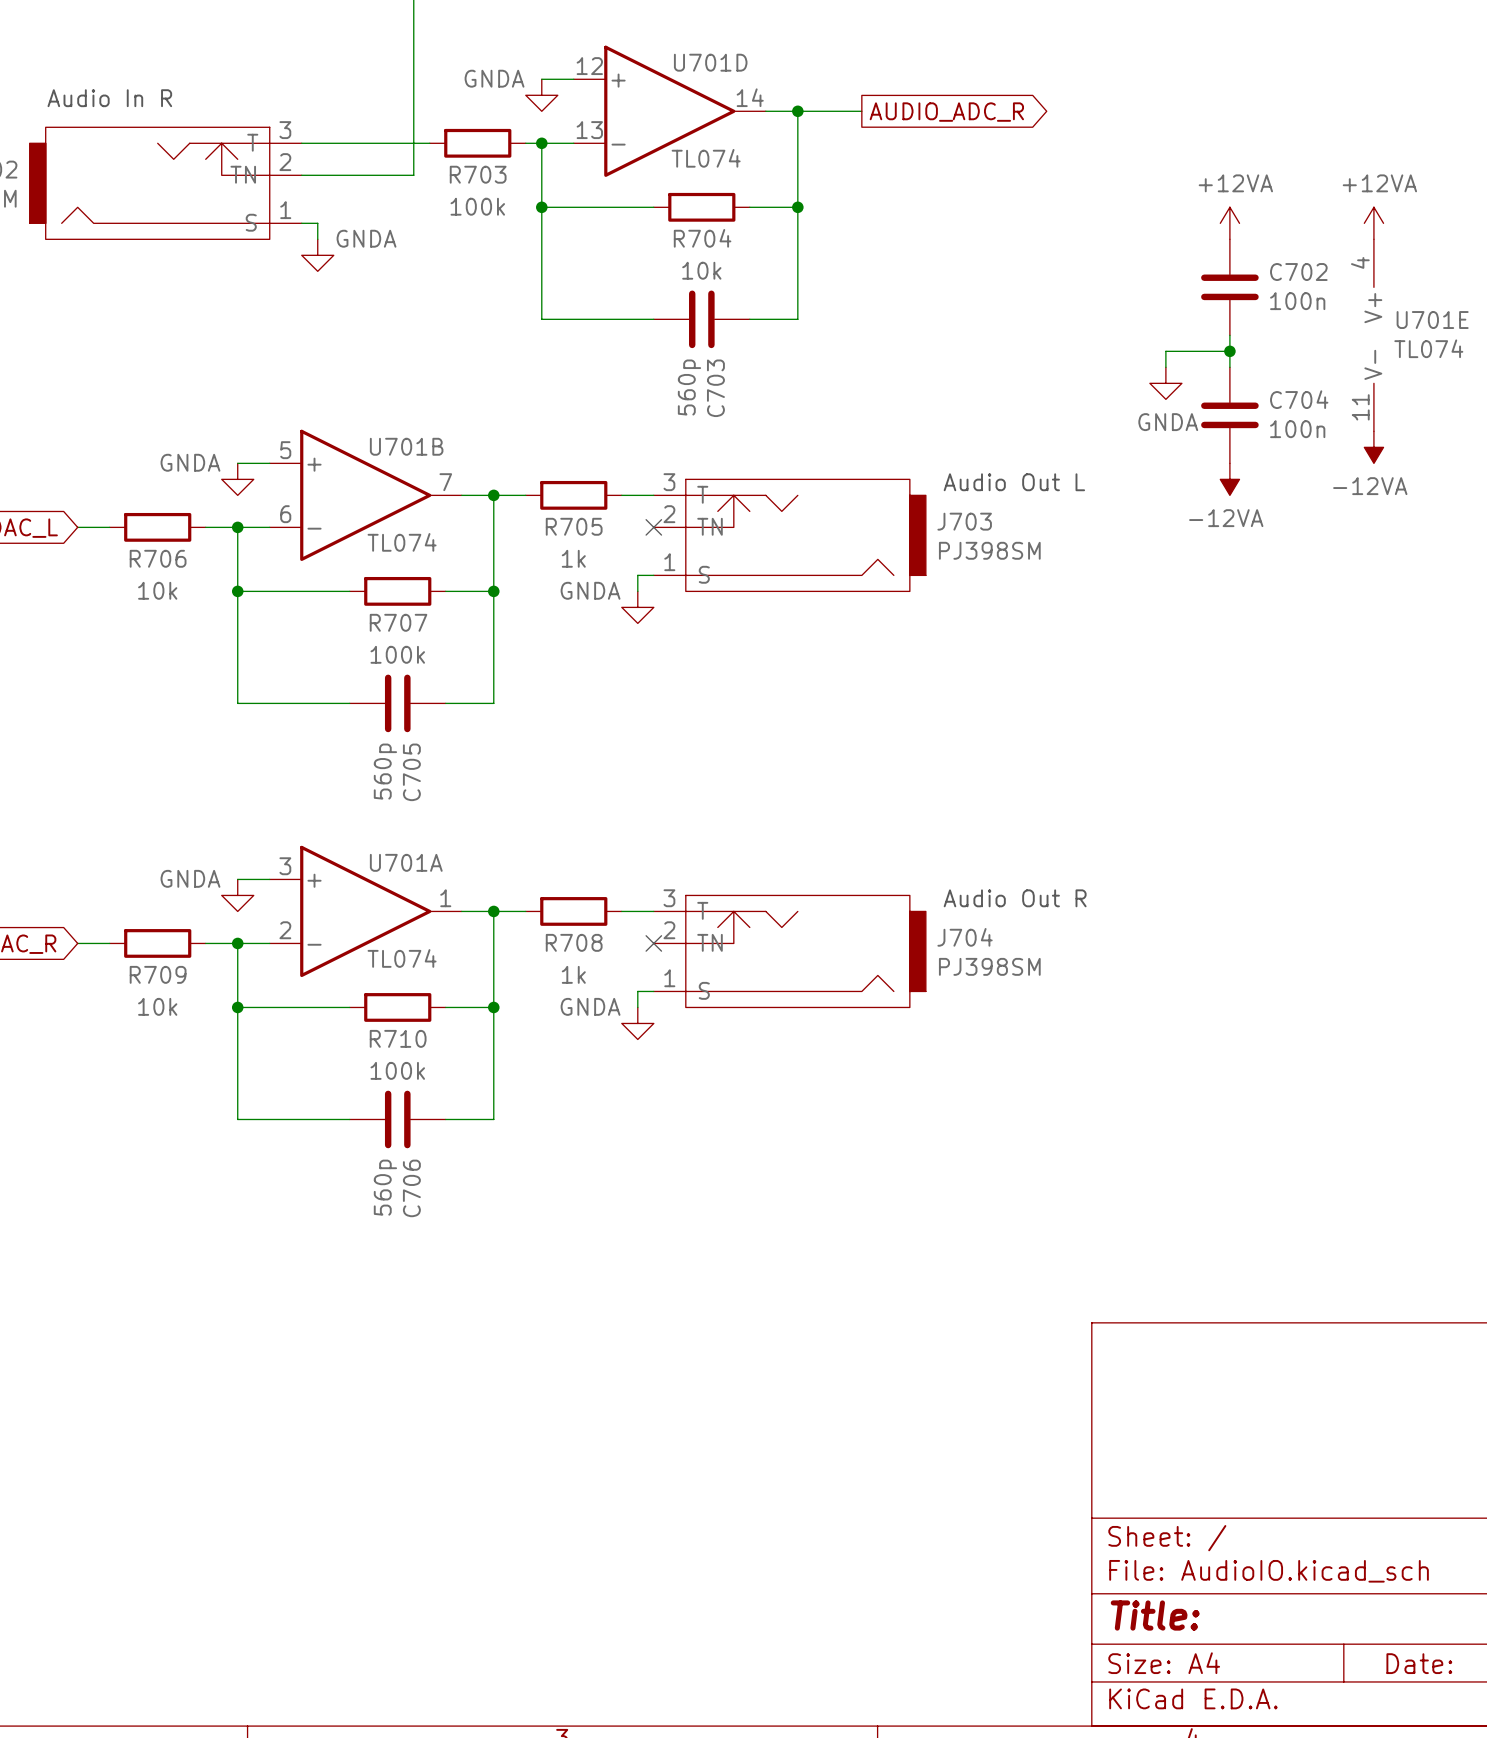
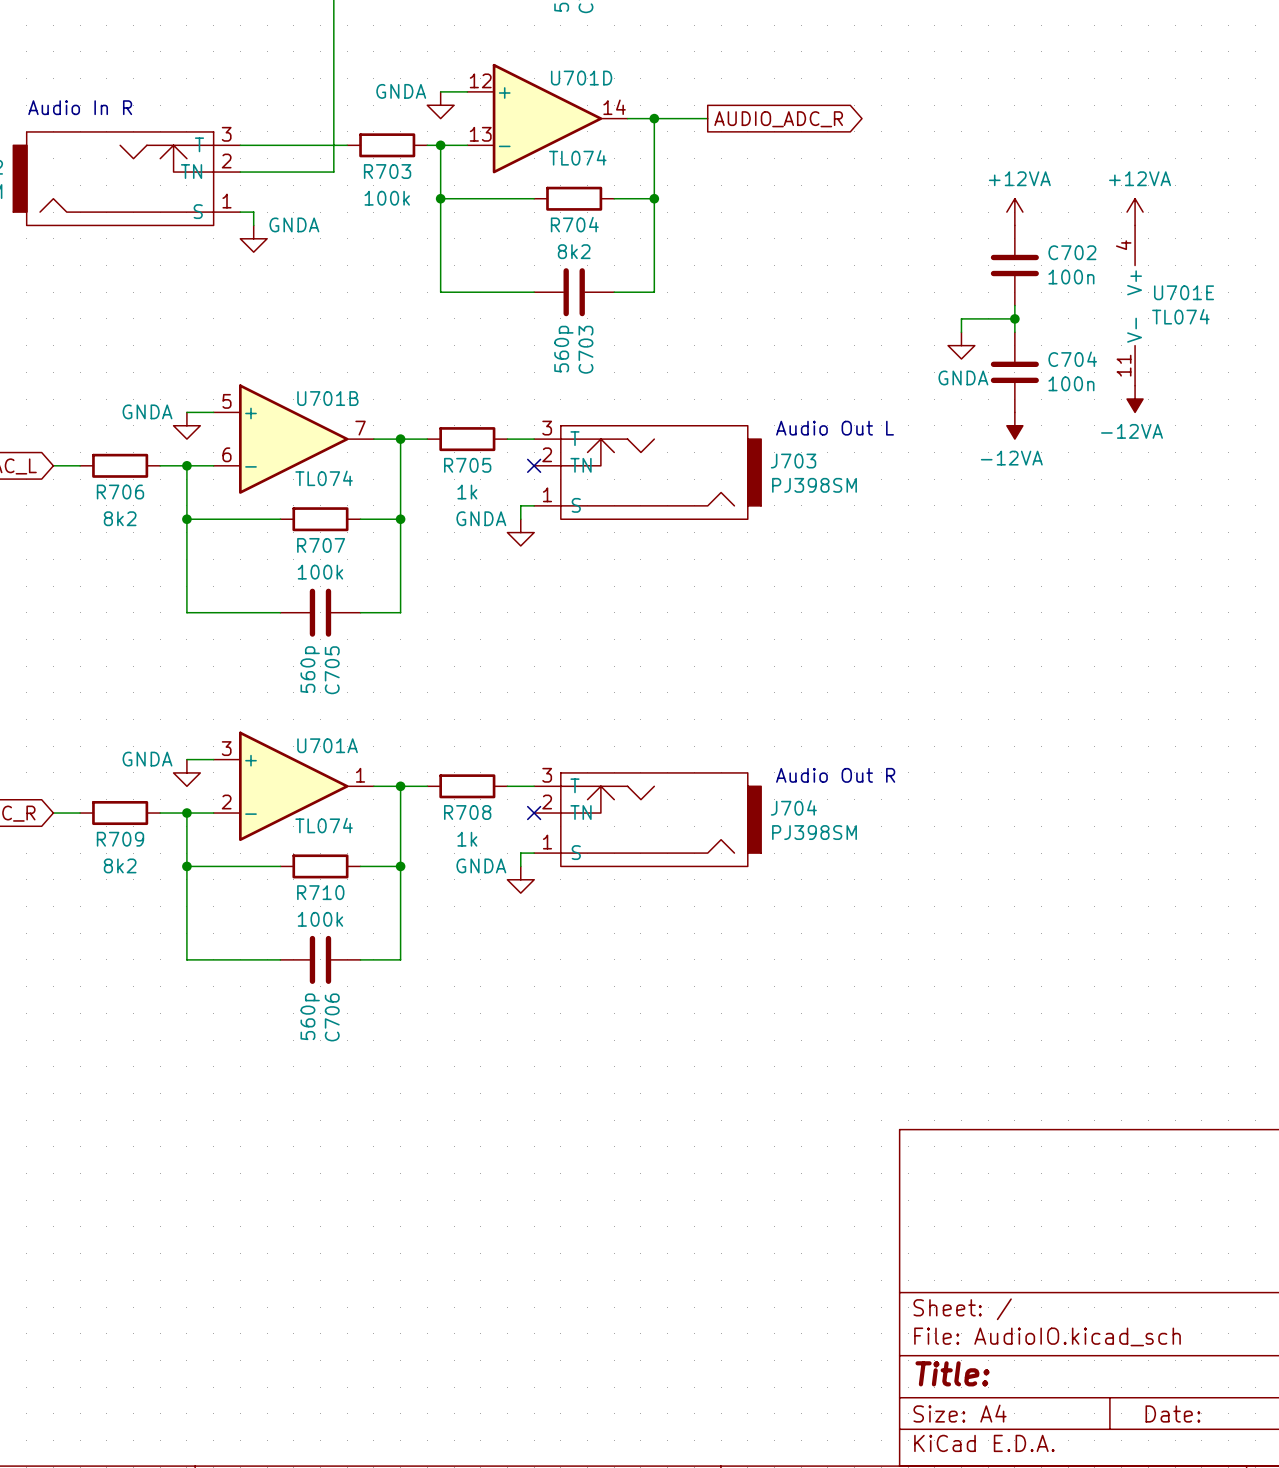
R704 value: 10k (701, 270) -> 8k2 (574, 251)
R706 value: 10k (157, 590) -> 8k2 (120, 518)
R709 value: 10k (157, 1006) -> 8k2 (120, 865)

